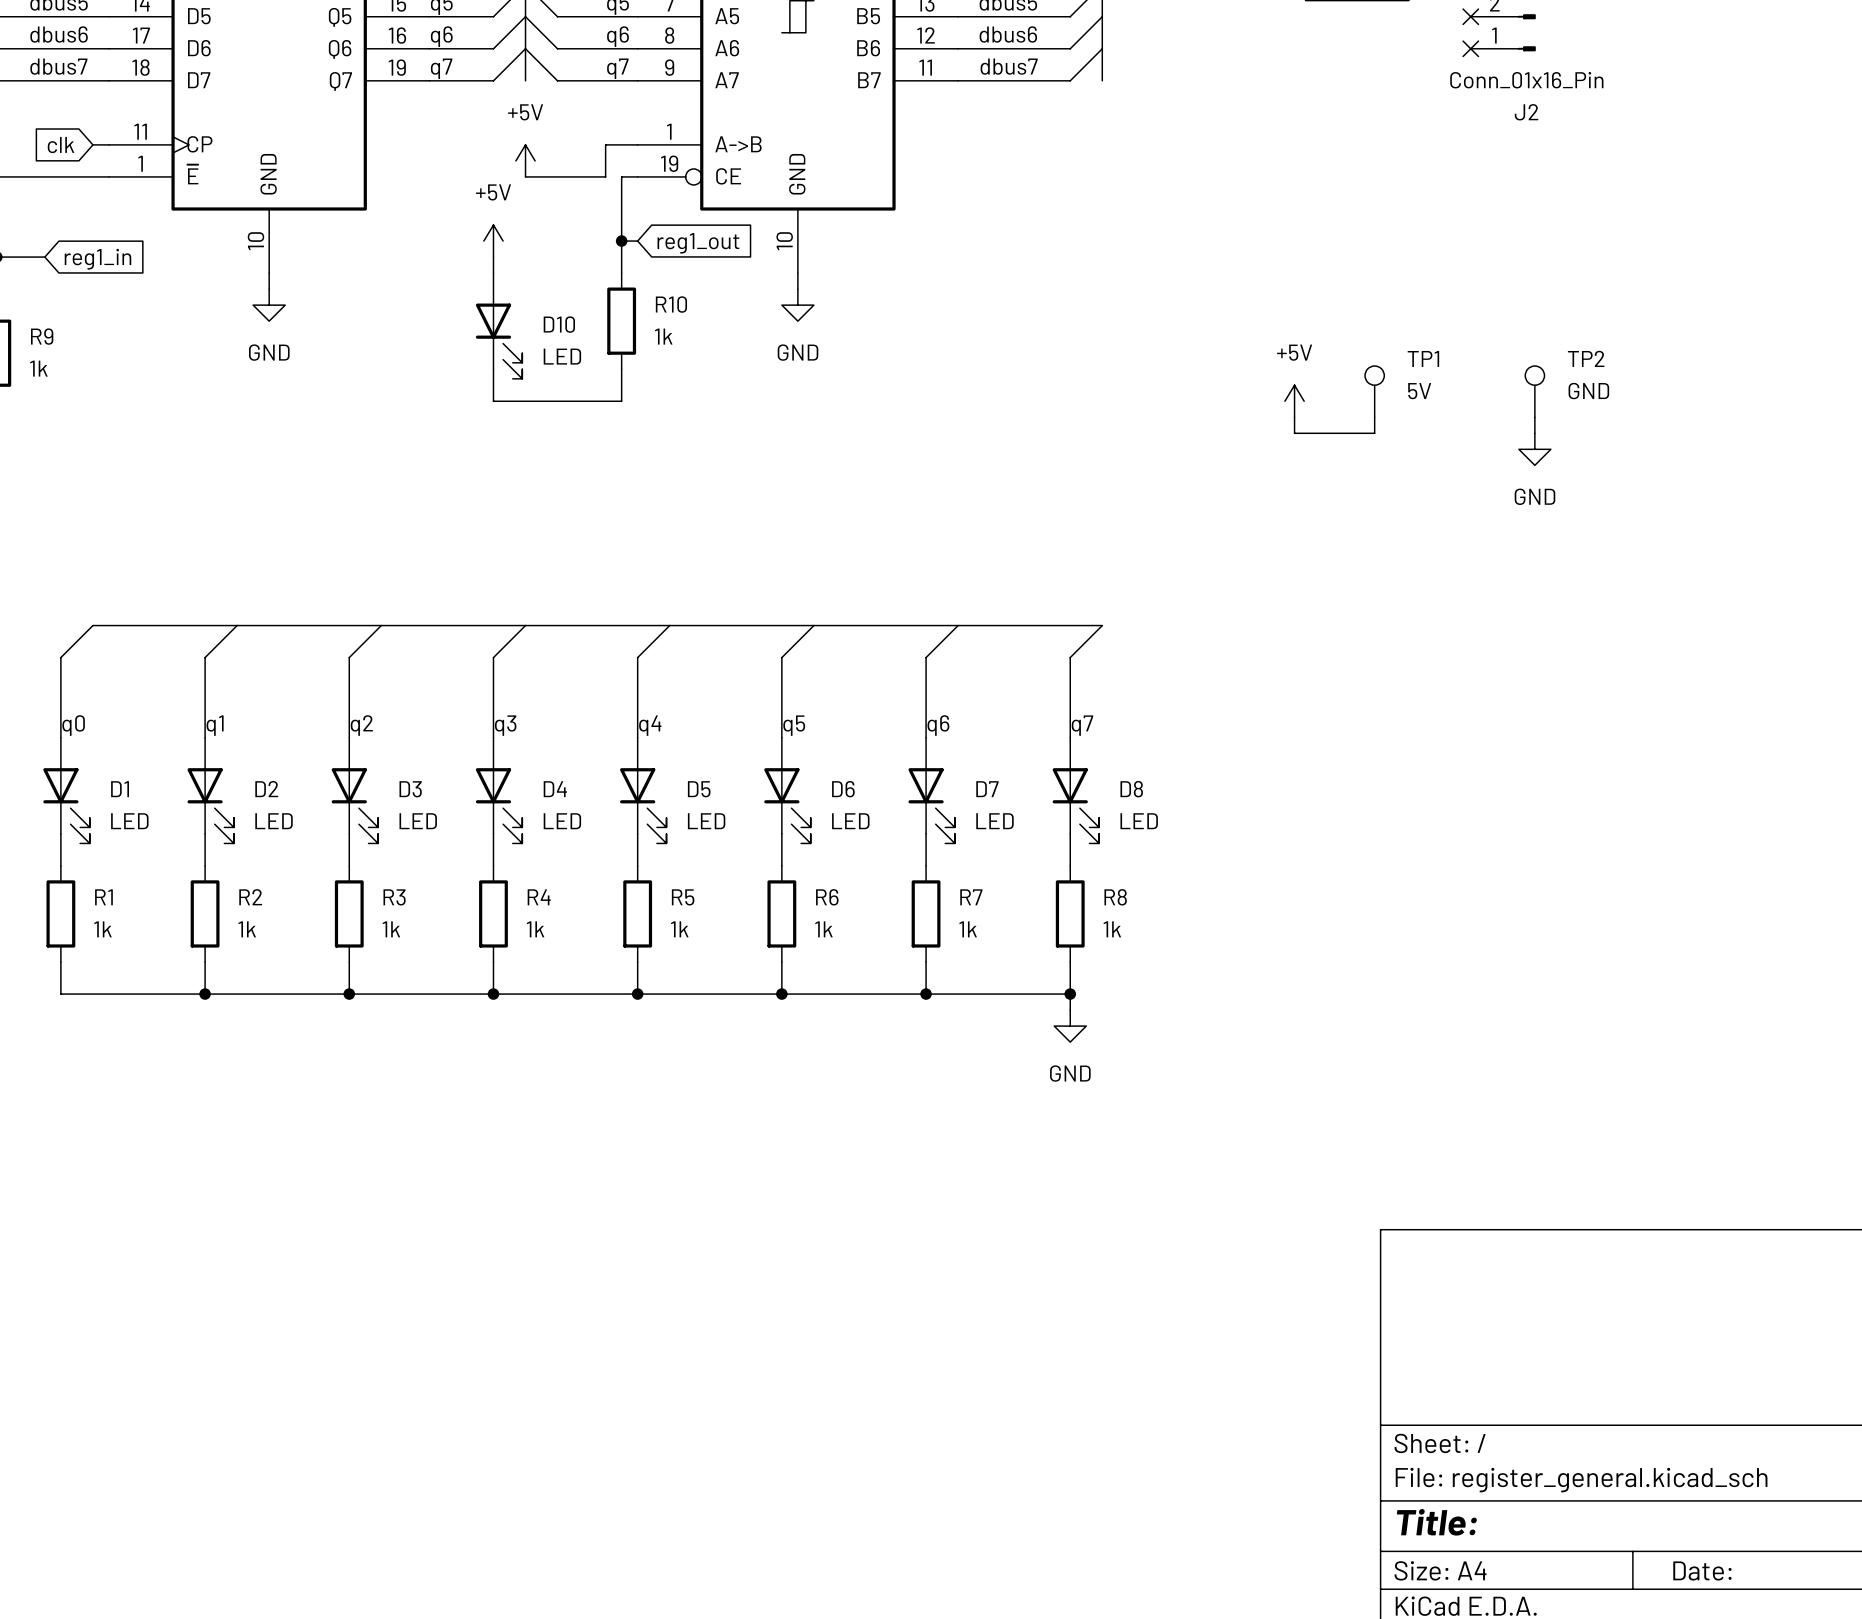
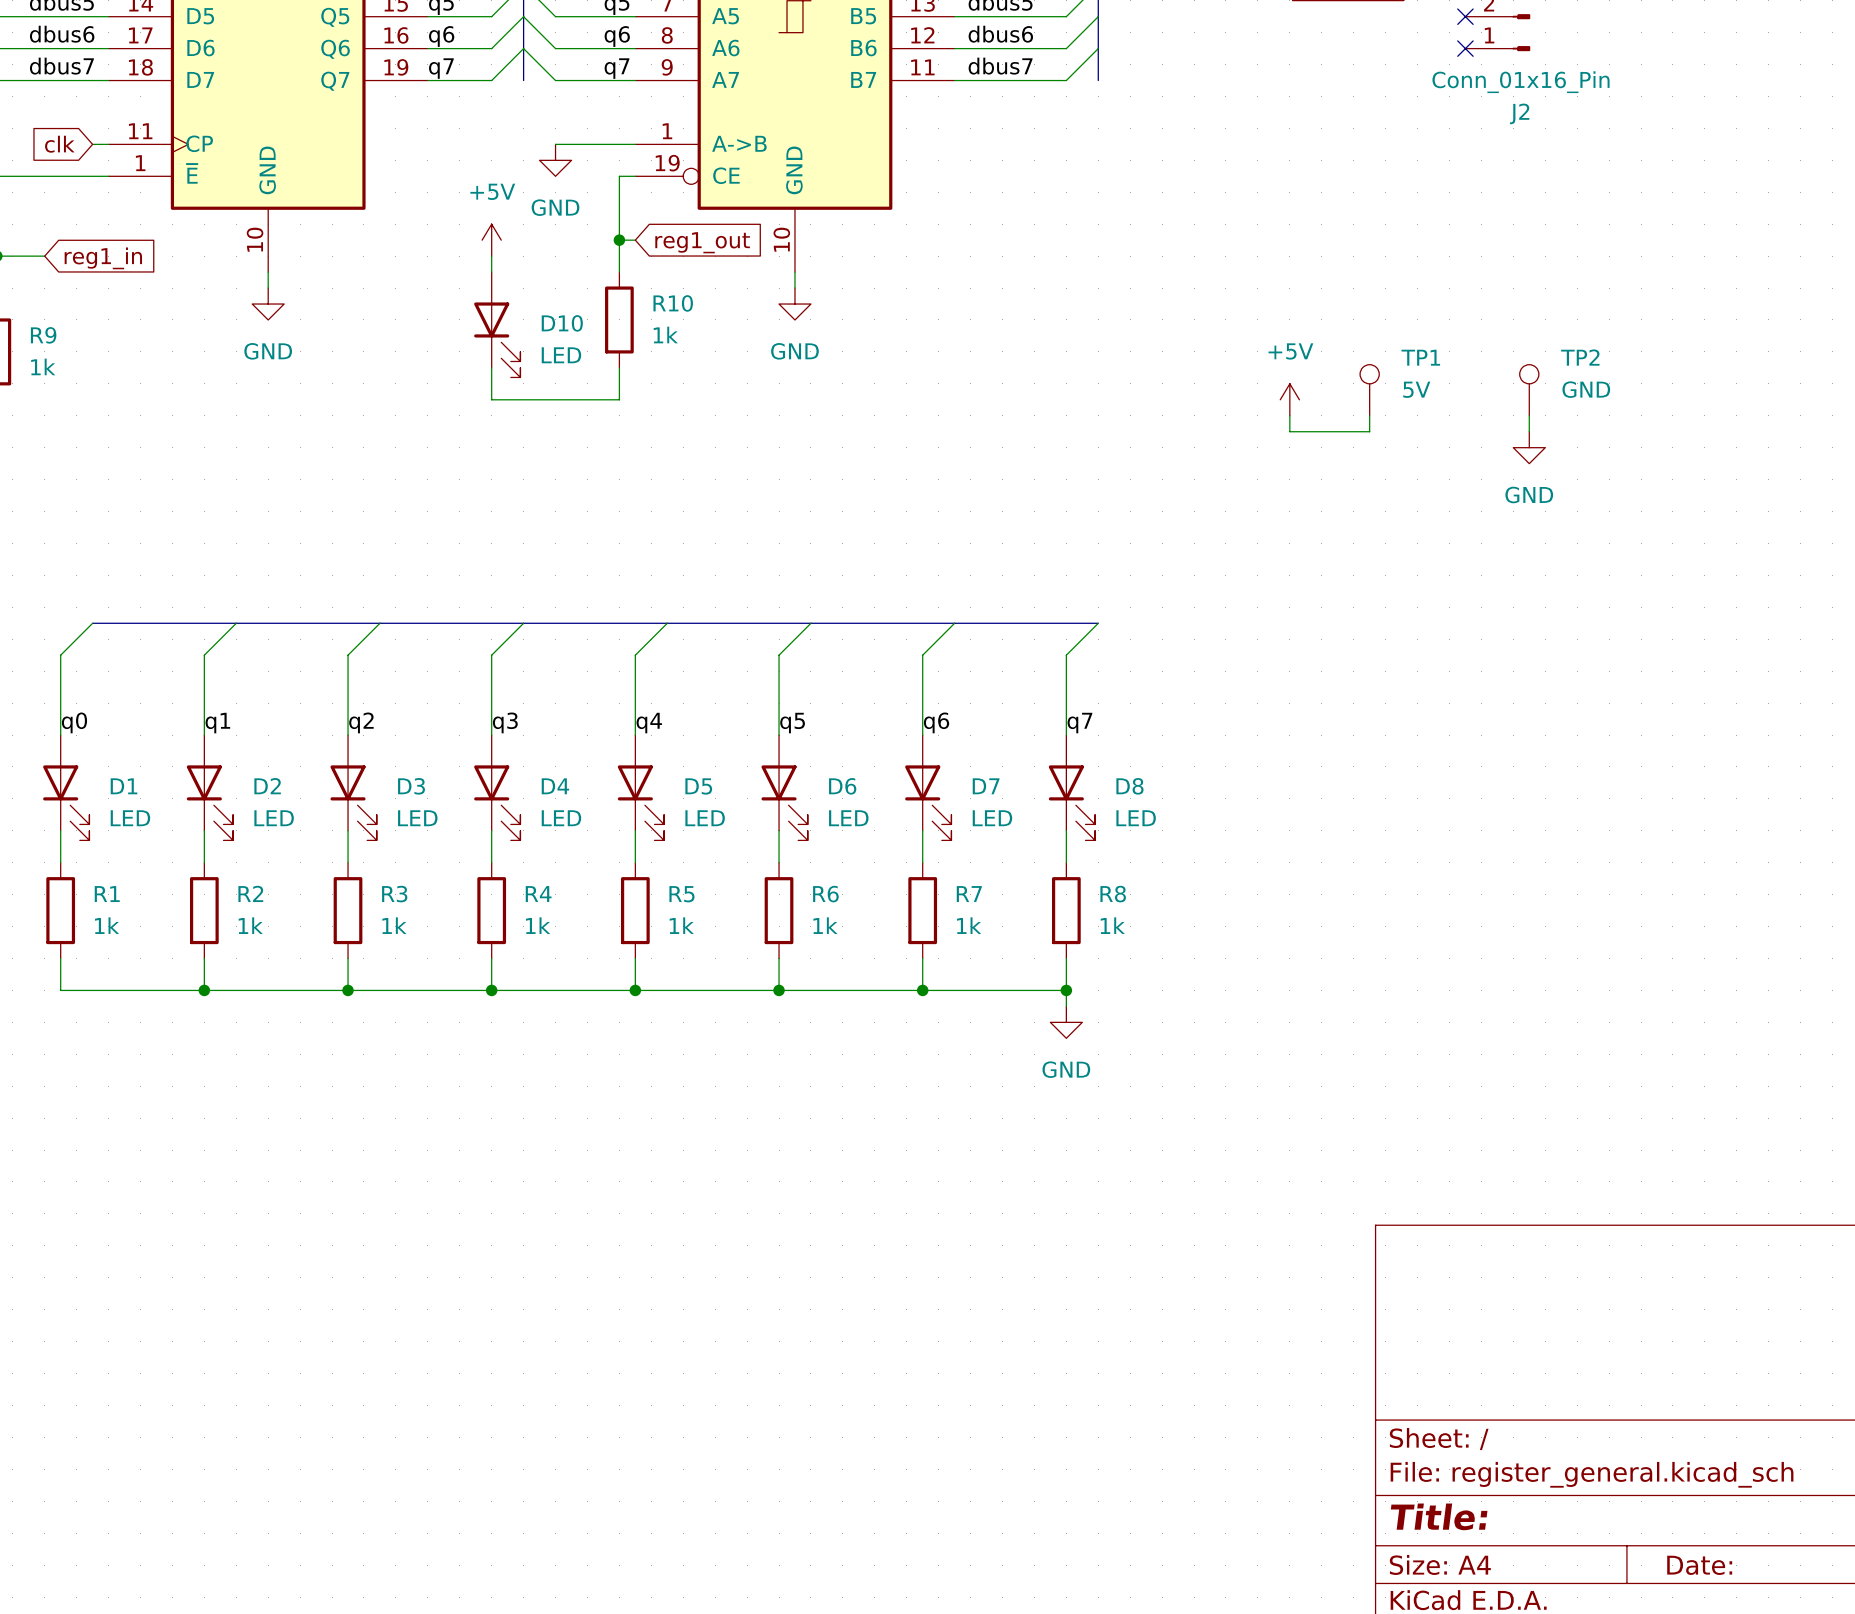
wire: (605, 144) (605, 176) (525, 176) -> (603, 144) (555, 144)
power symbol: +5V (525, 160) -> none
power symbol: none -> GND (555, 160)

